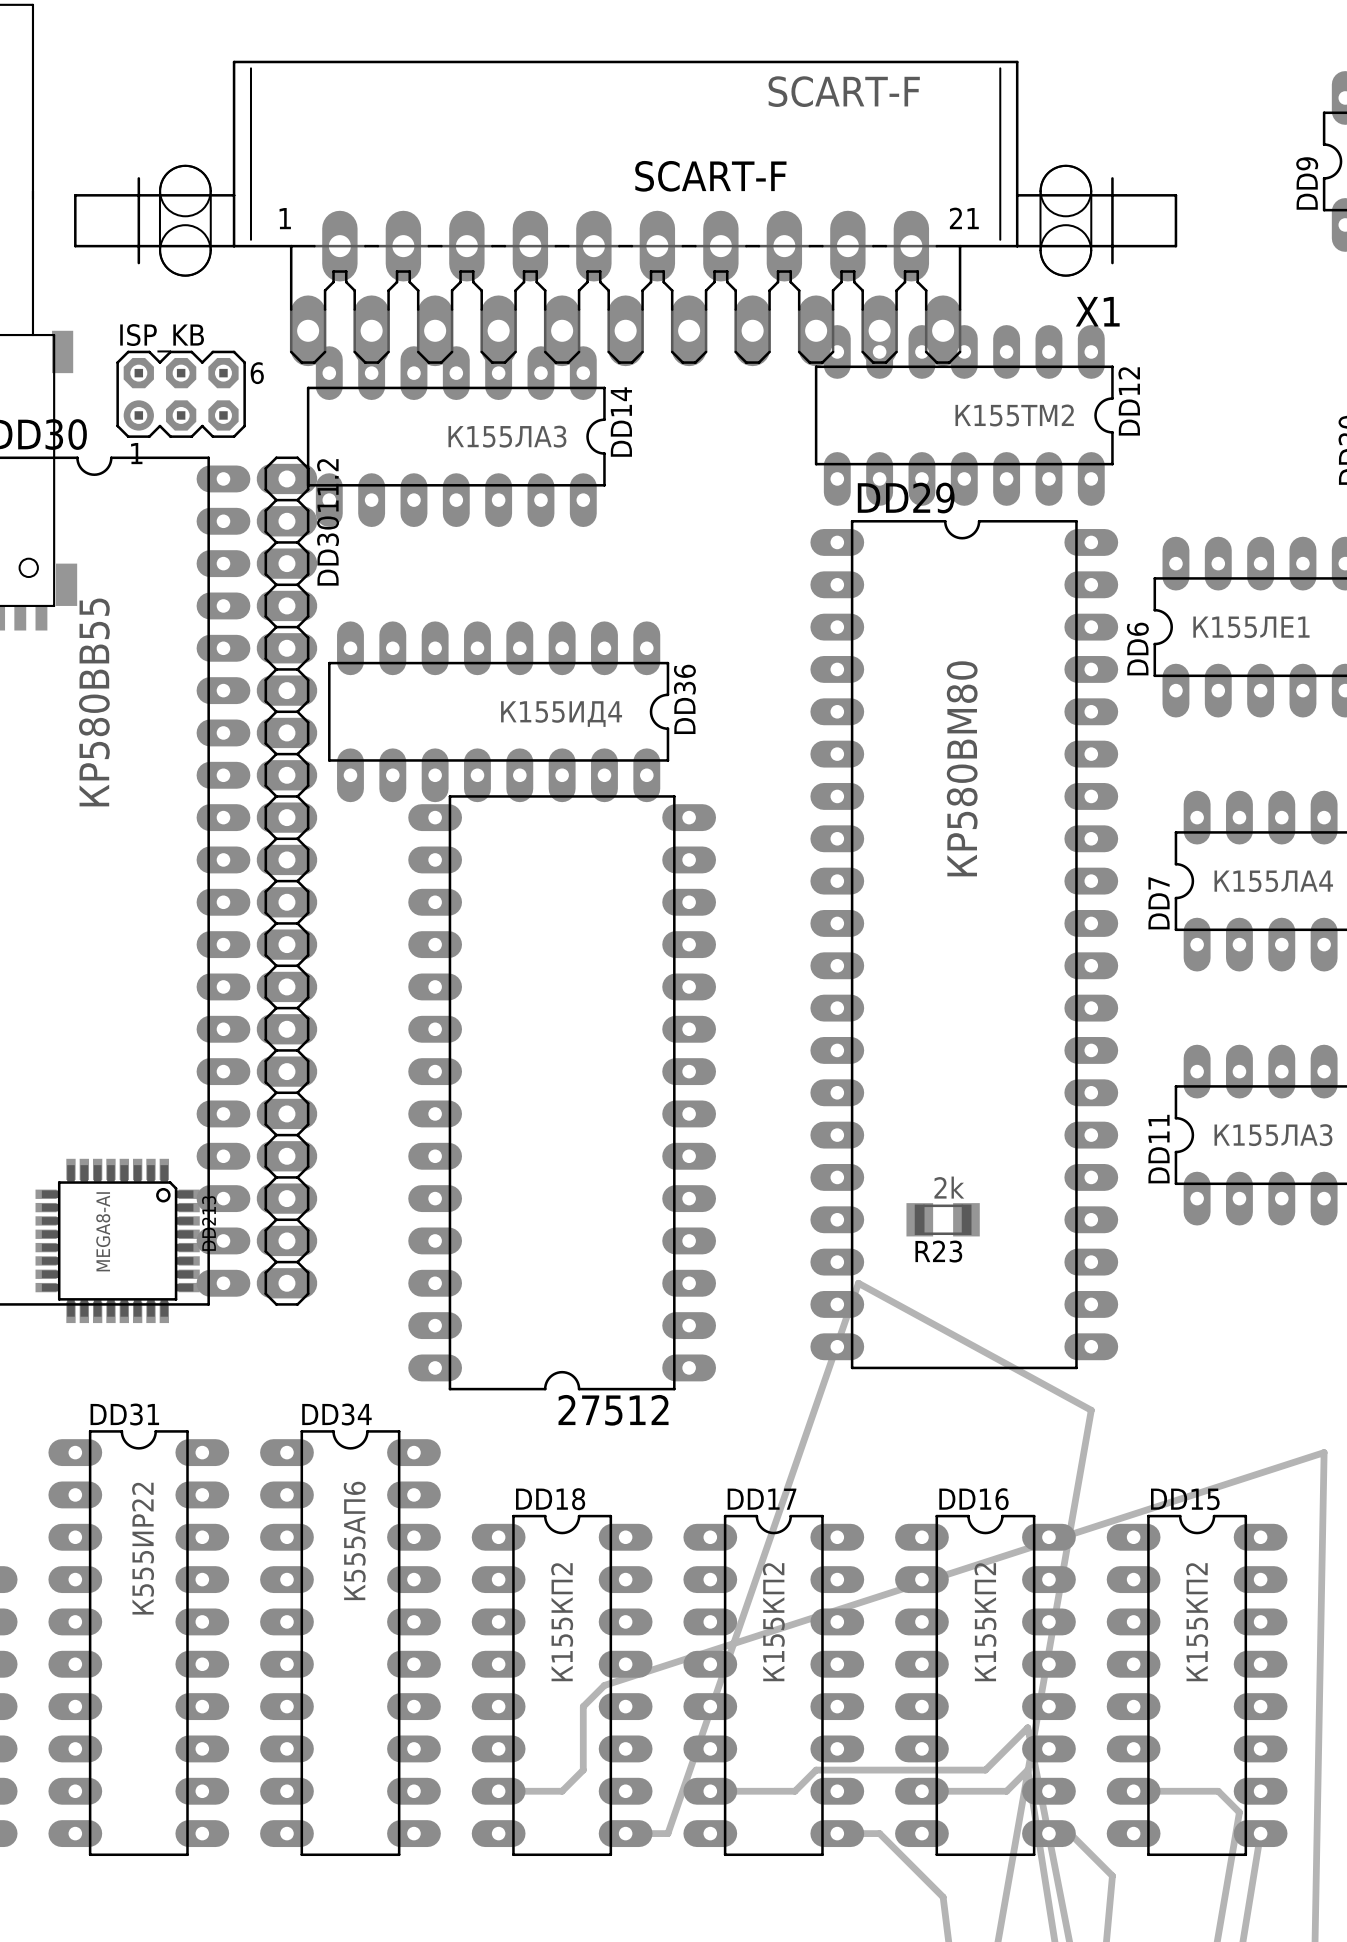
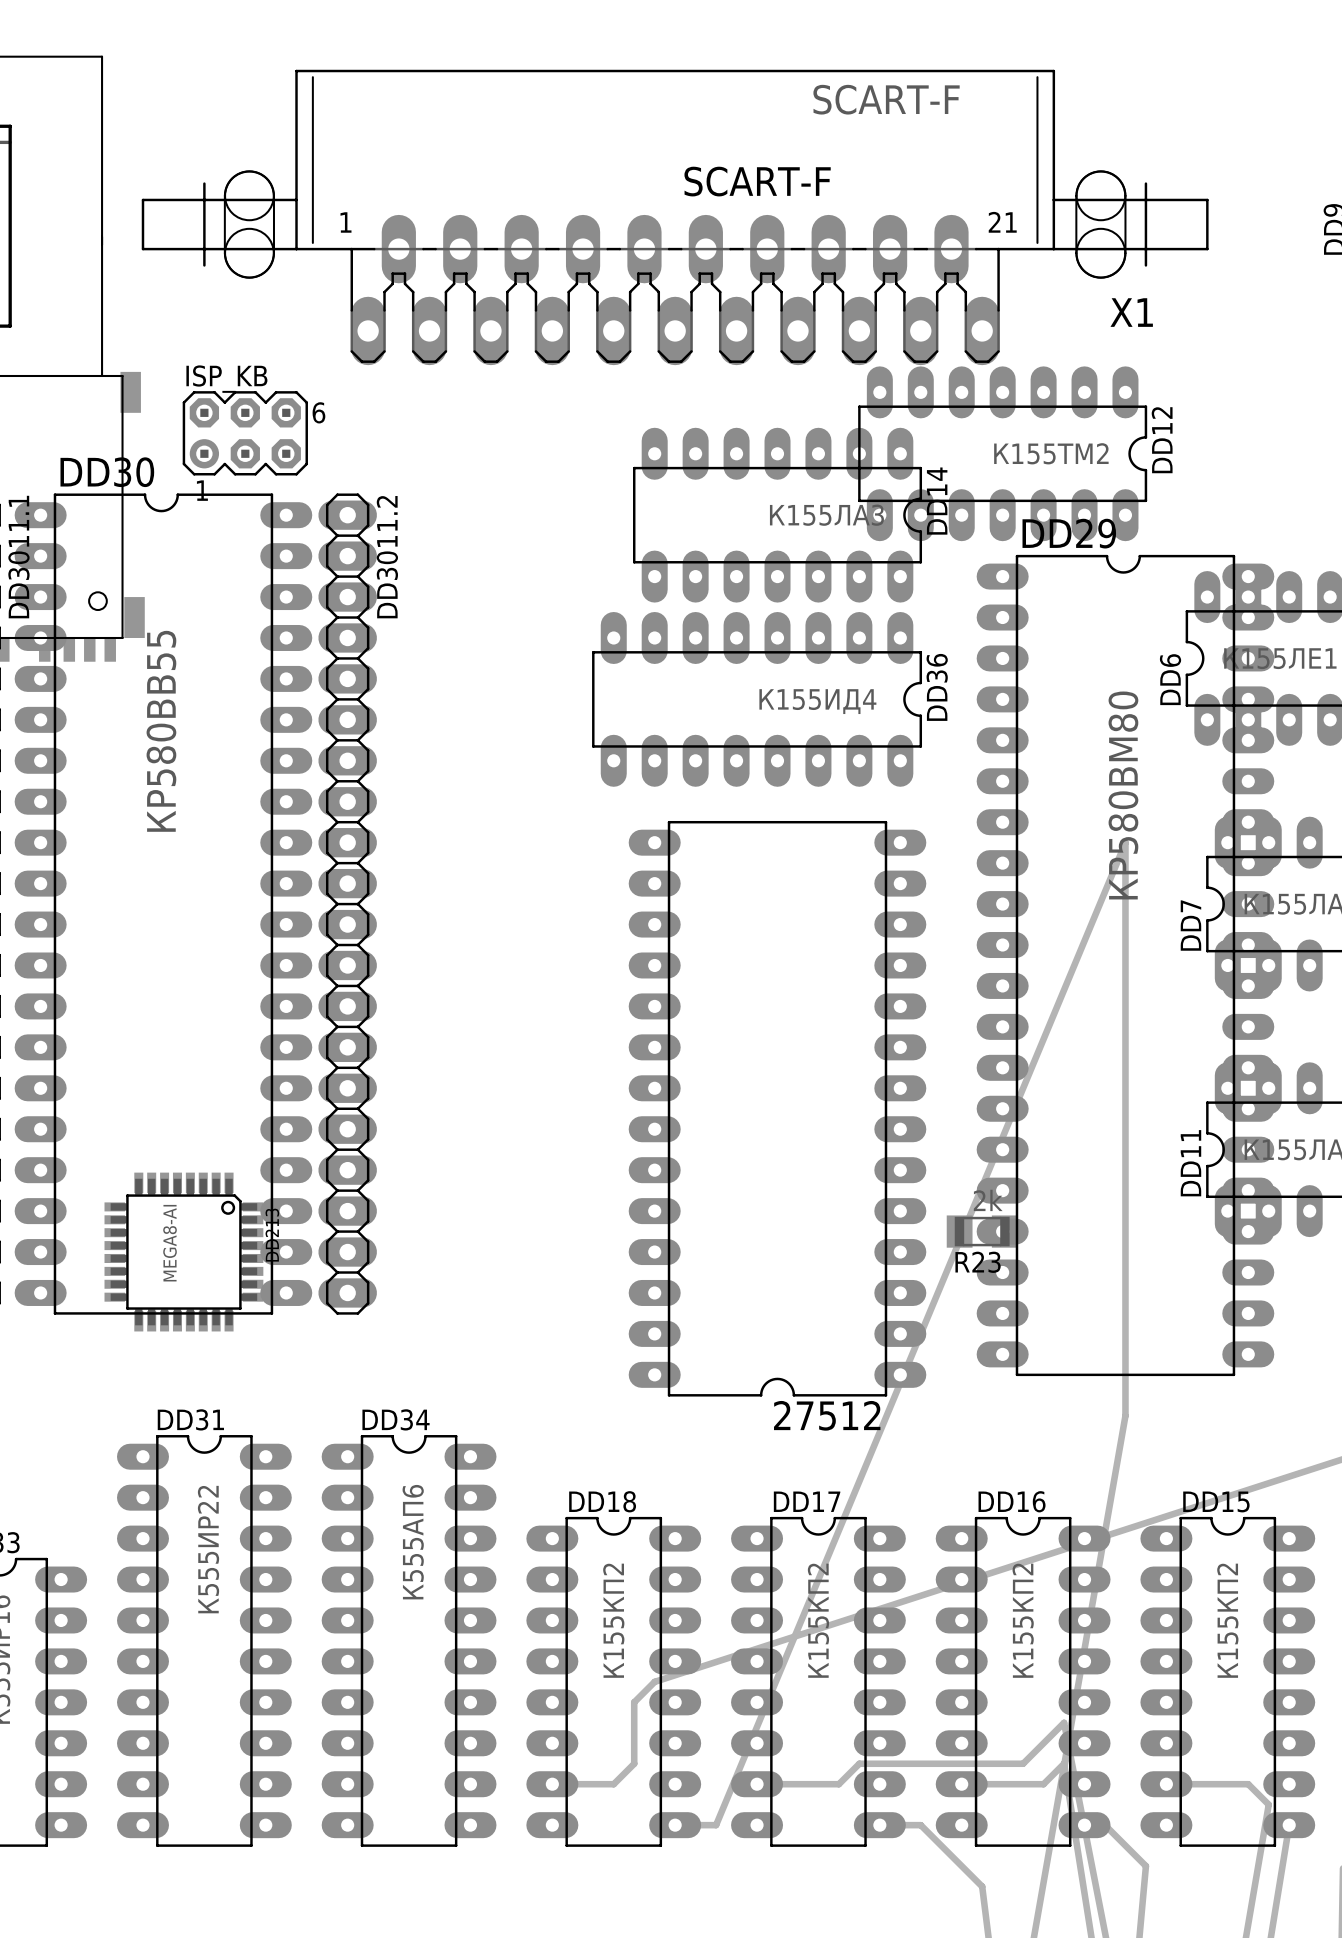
X1 position: (625, 213) -> (675, 217)
DD14 position: (456, 436) -> (777, 515)
DD36 position: (498, 711) -> (757, 699)
DD29 position: (964, 944) -> (1125, 965)
27512 position: (562, 1092) -> (777, 1108)
track: (1091, 1410) (858, 1283) (667, 1833) -> (1125, 1415) (1125, 842) (716, 1825)

